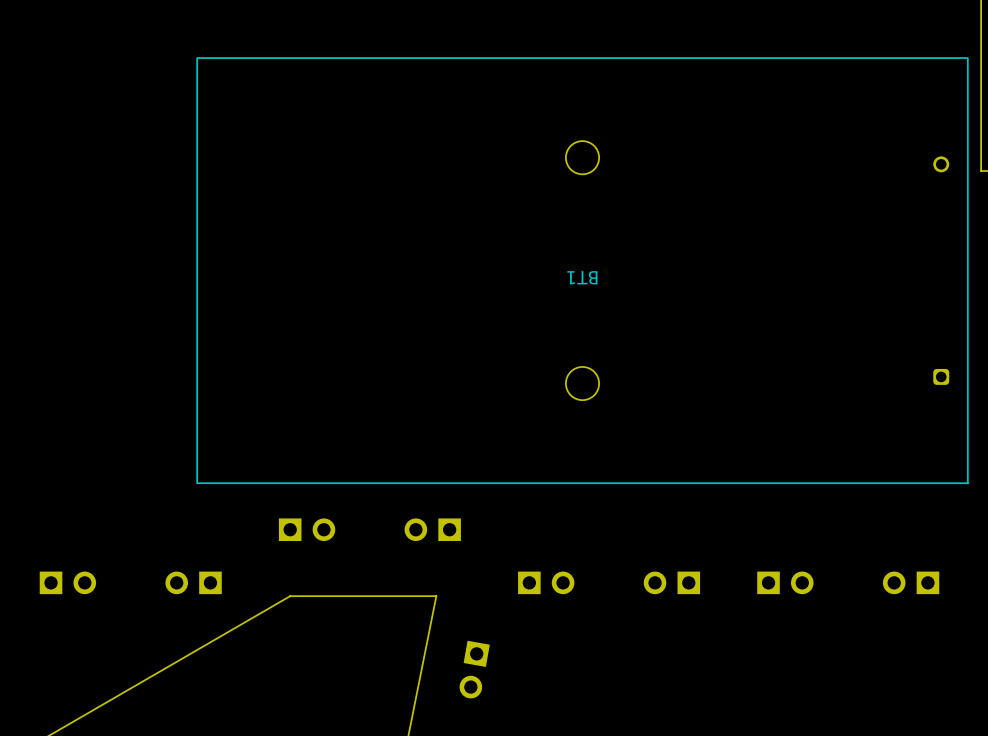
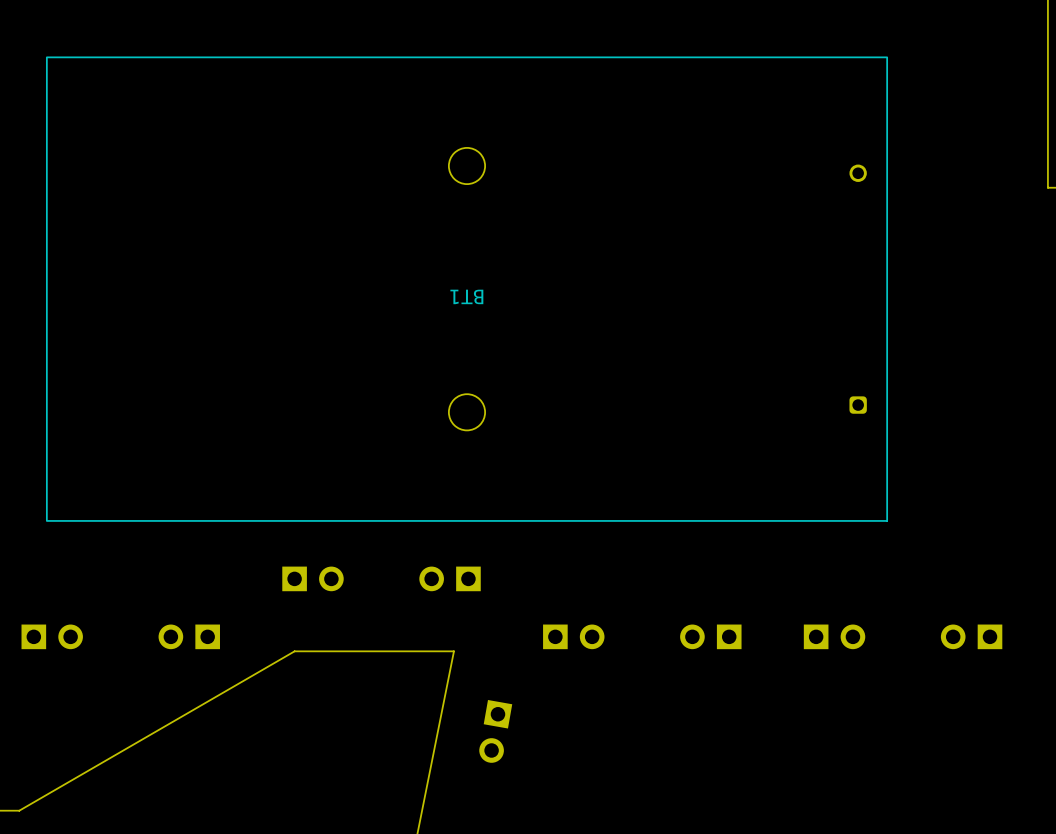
BT1 position: (582, 270) -> (467, 289)

